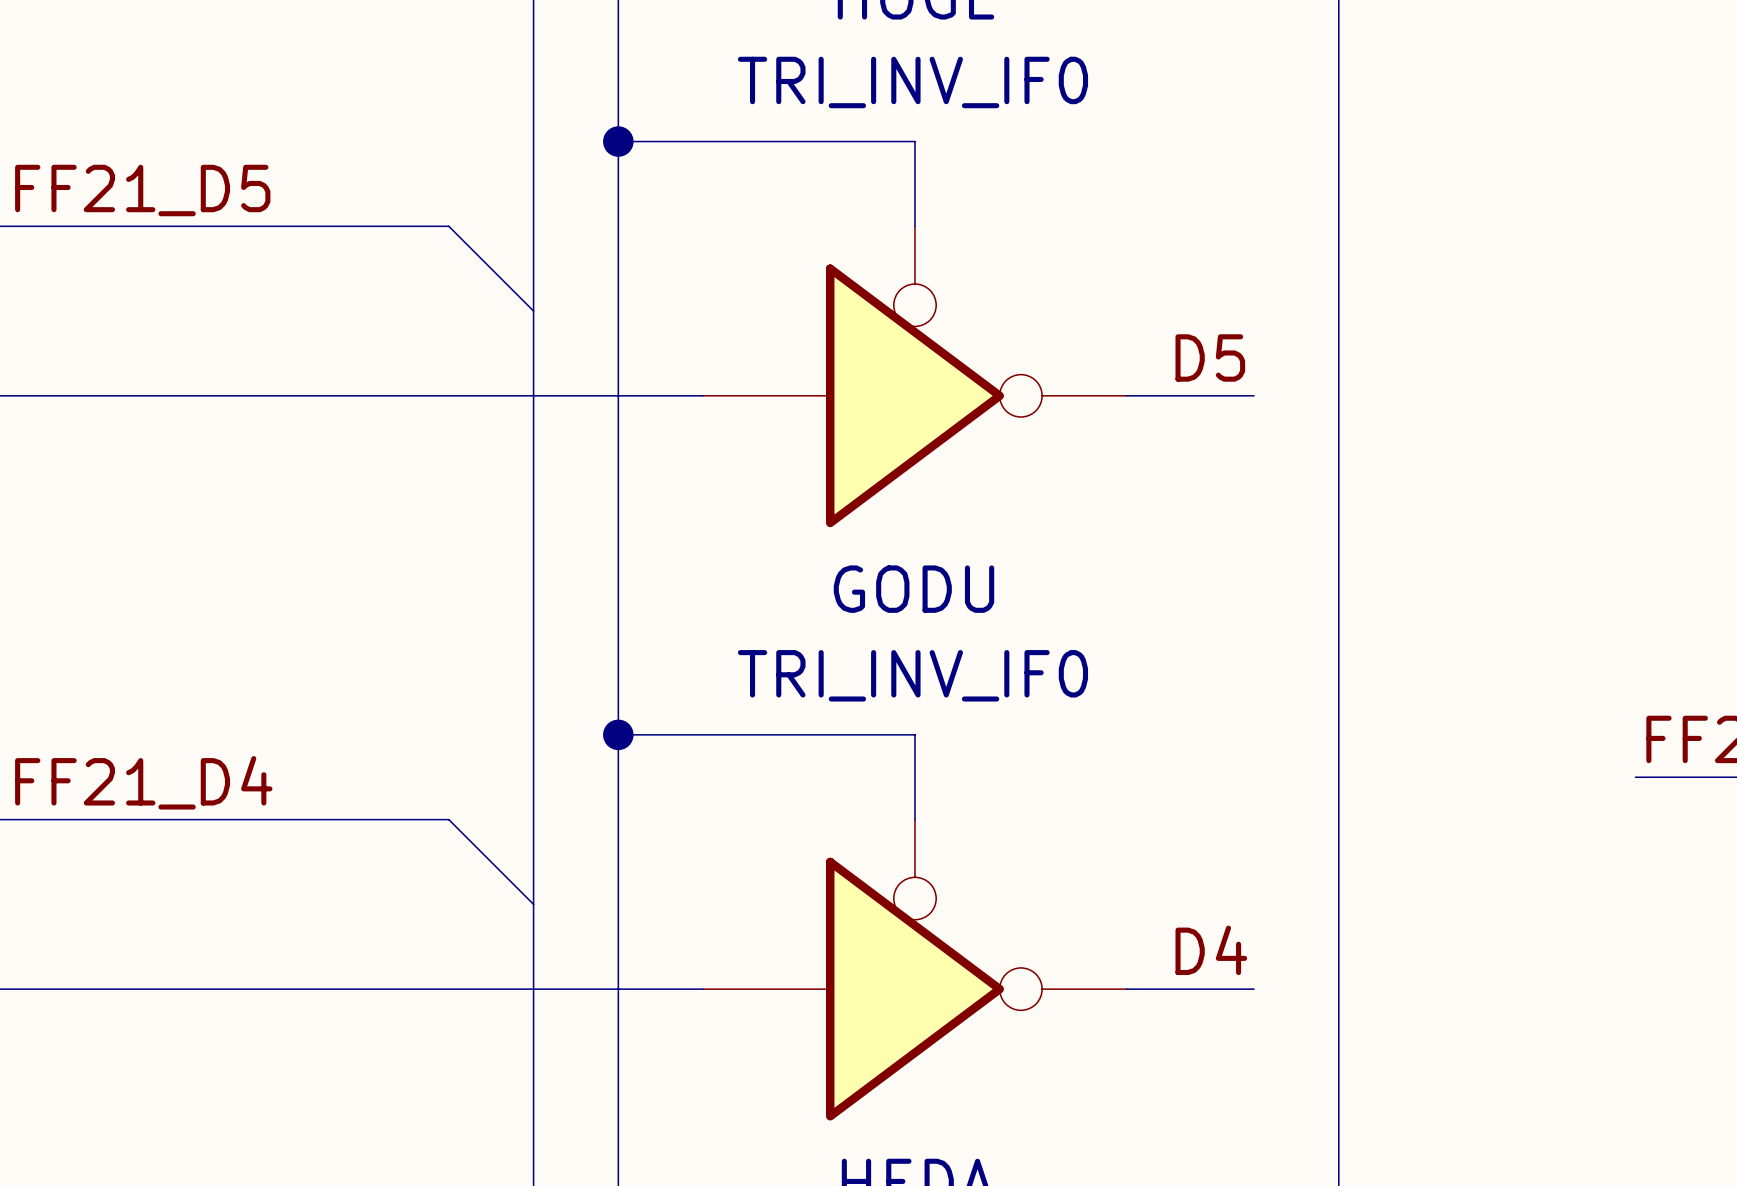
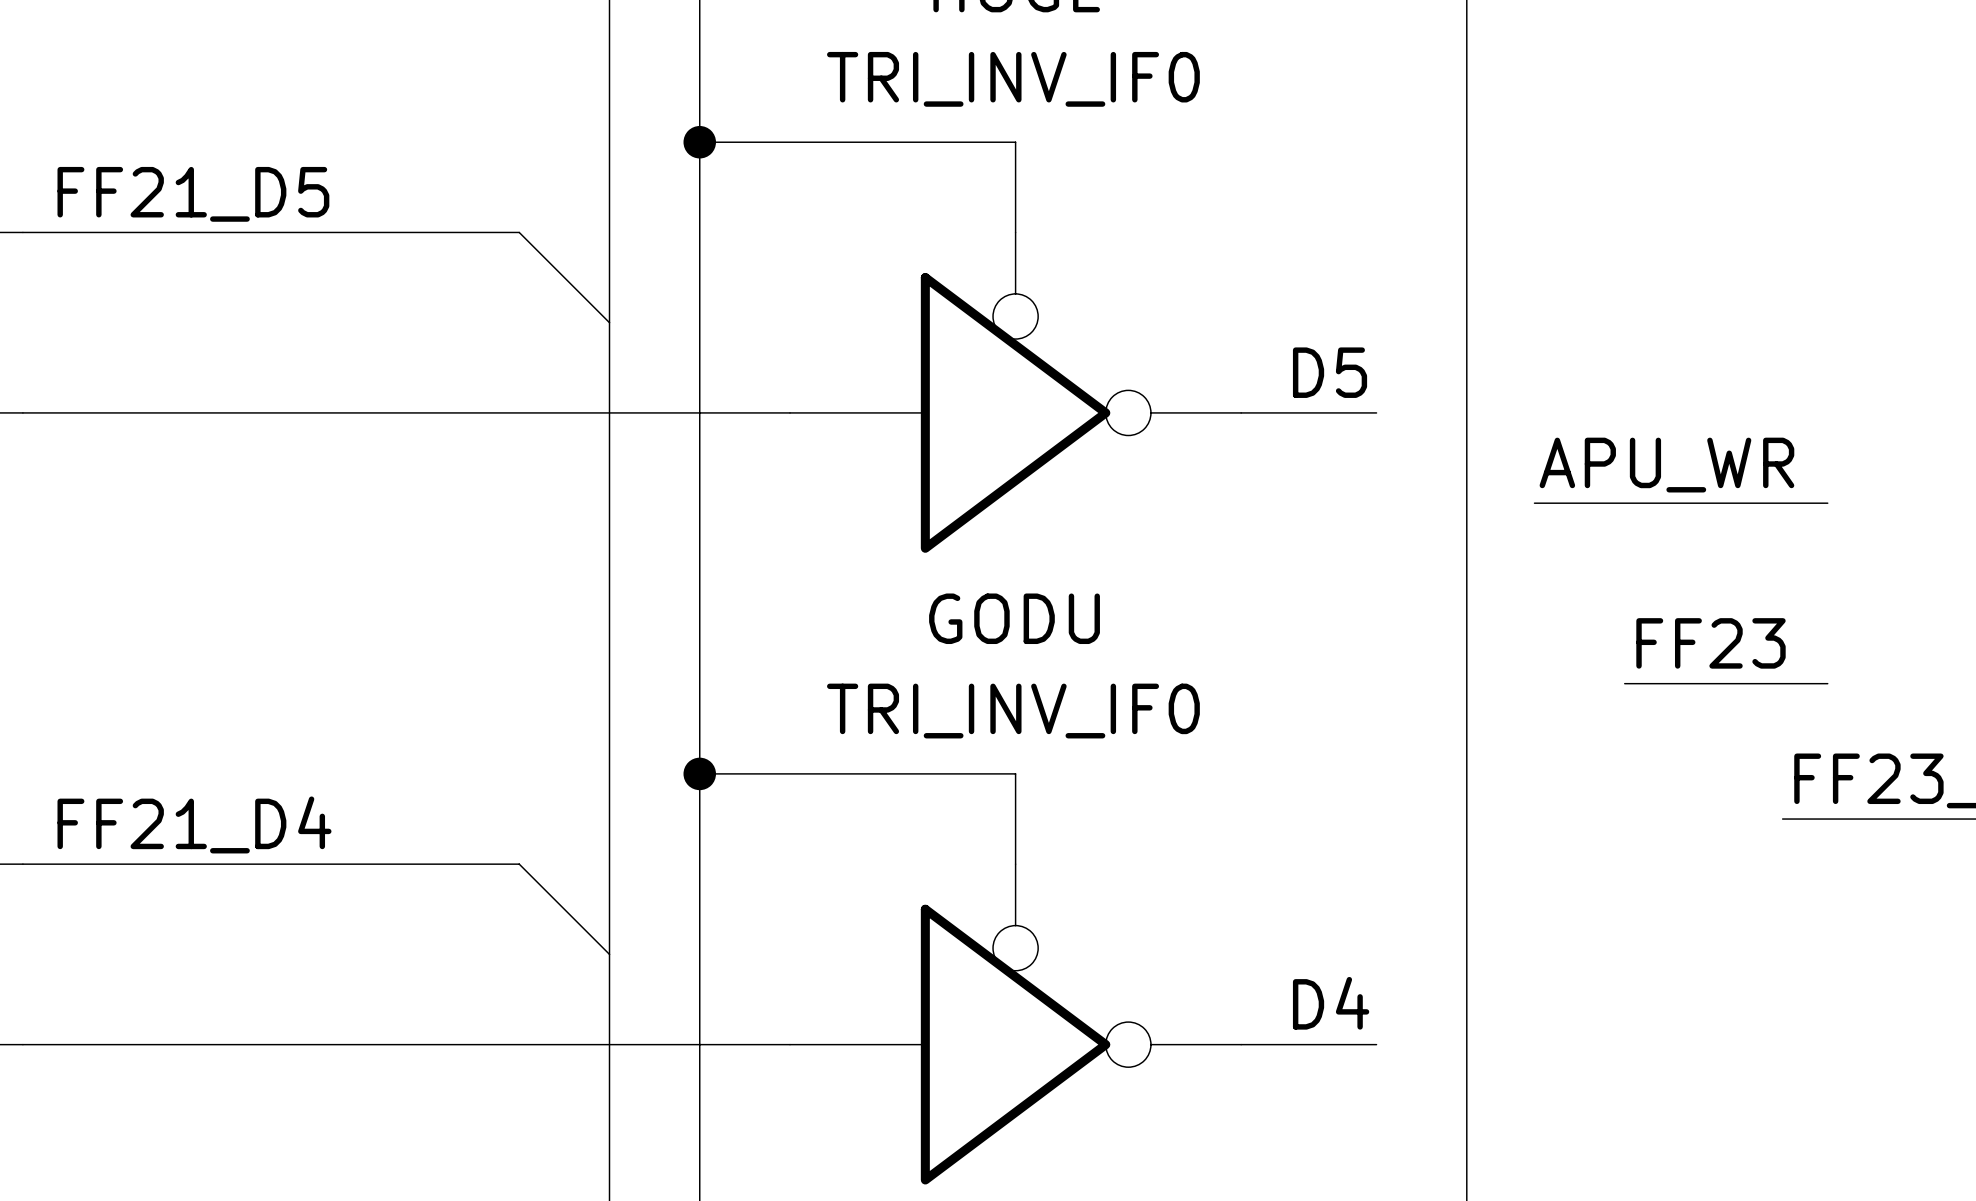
label: none -> APU_WR (1666, 465)
wire: none -> (1534, 503) (1827, 503)
label: none -> FF23 (1711, 643)
wire: none -> (1624, 683) (1827, 683)

